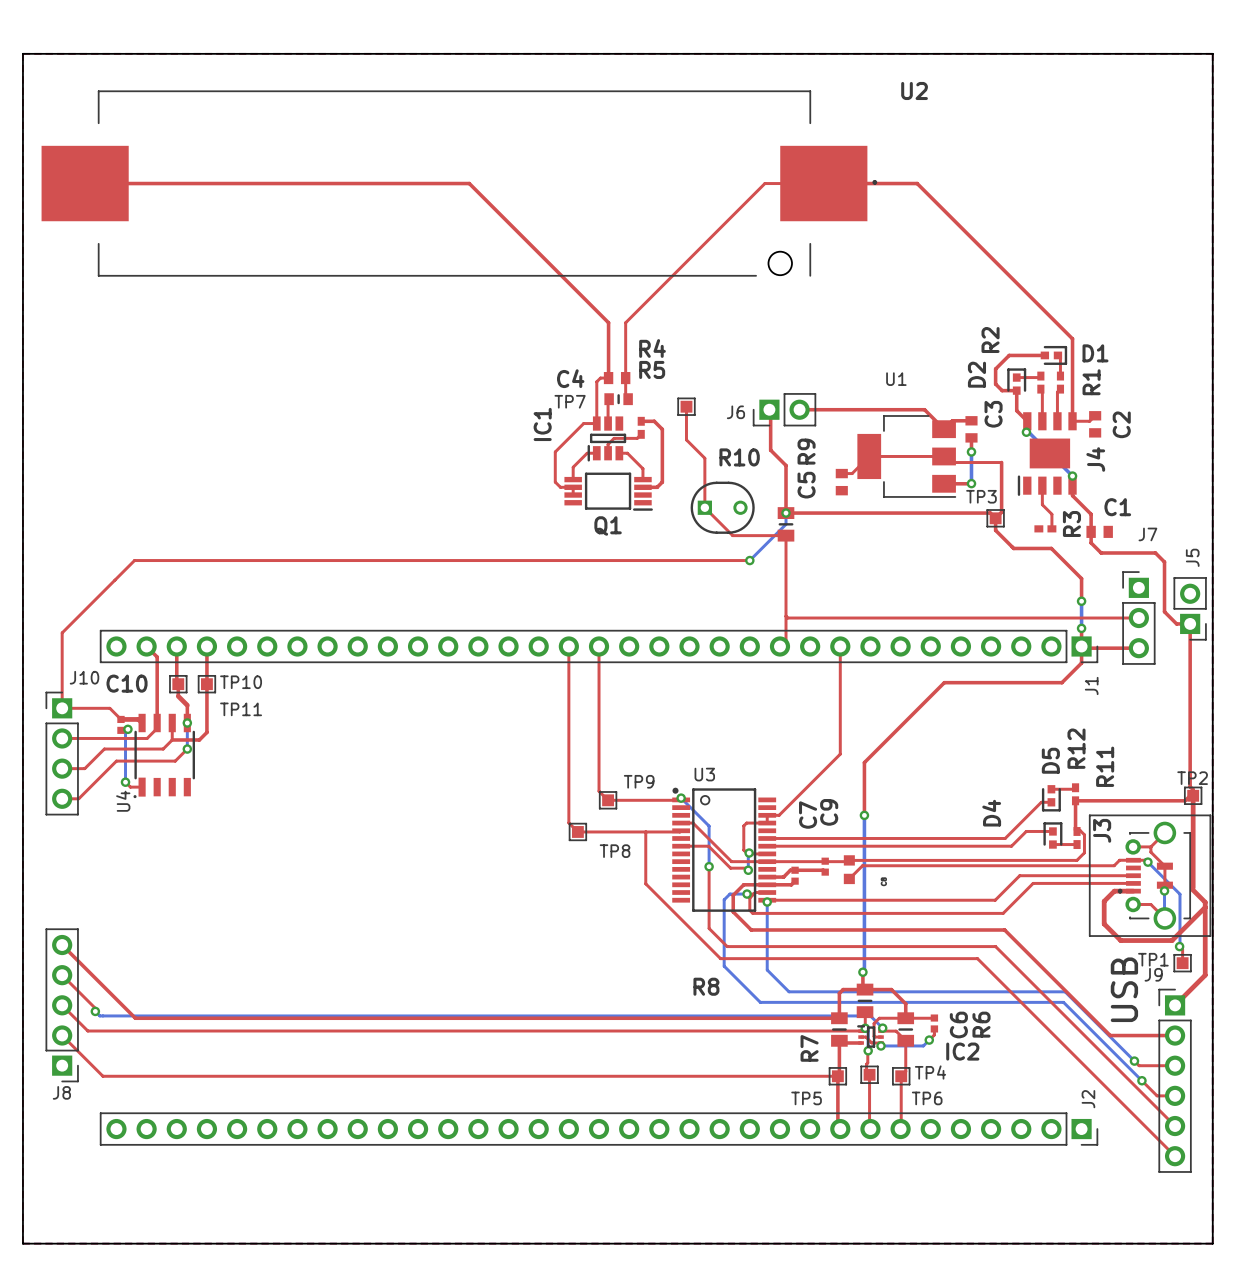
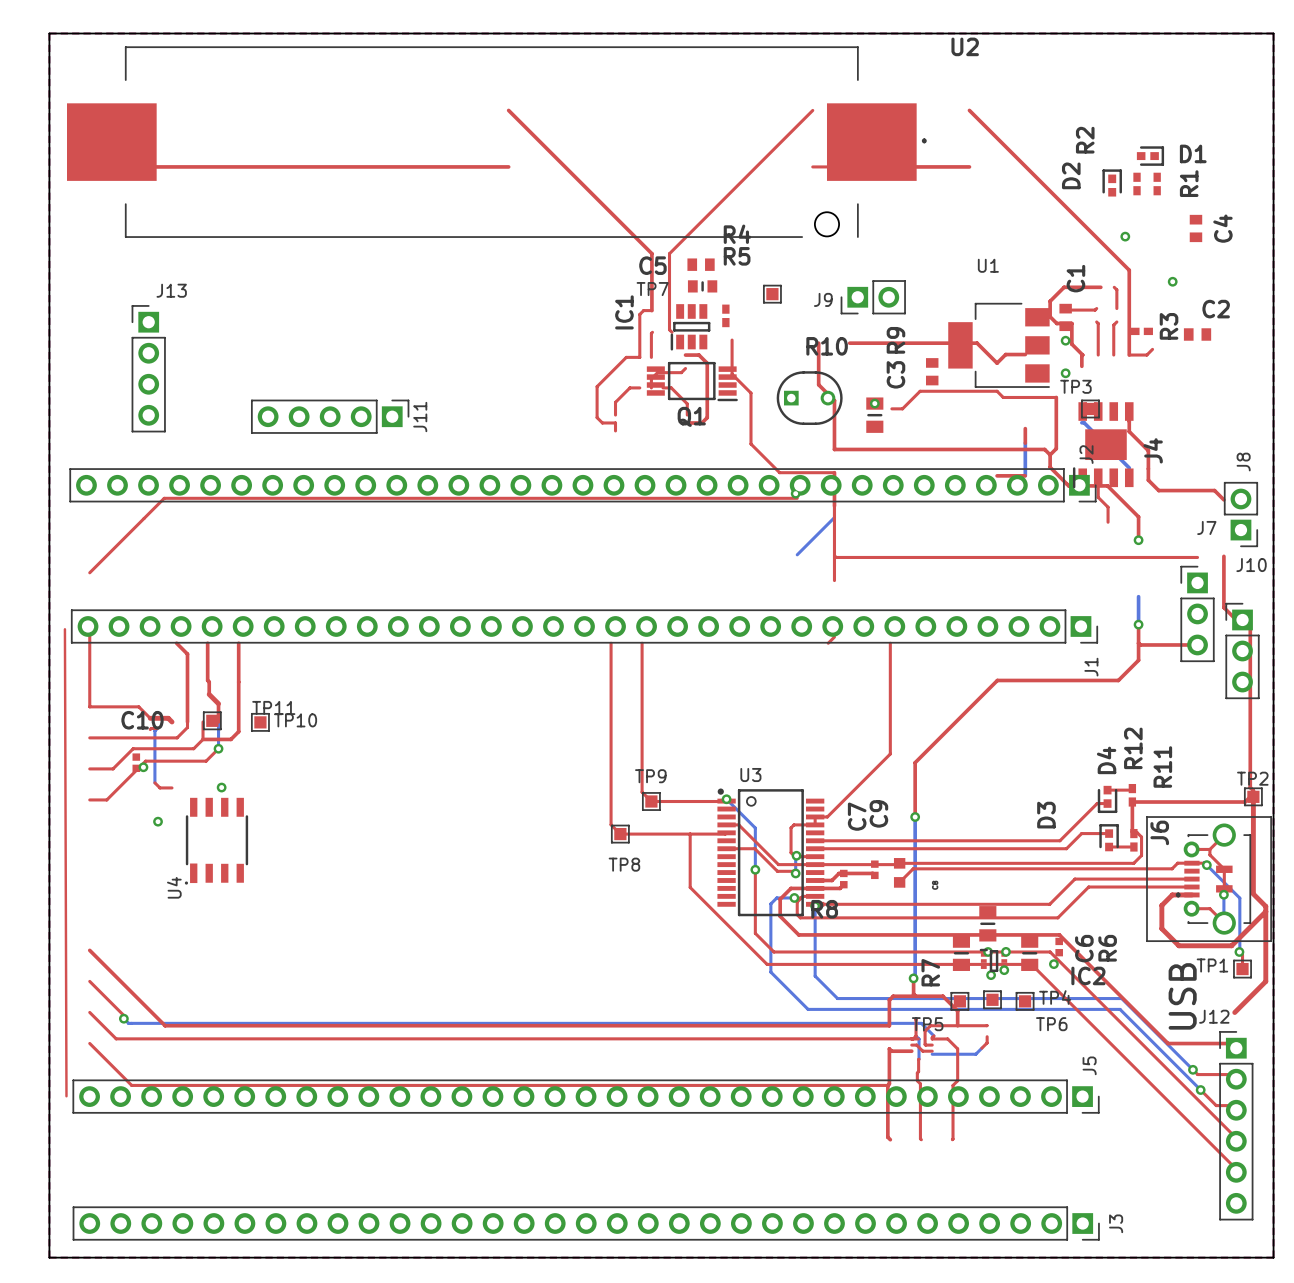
U2 position: (459, 183) -> (496, 142)
top track: (469, 183) (608, 322) -> (508, 110) (651, 253) (651, 310)
top track: (764, 183) (625, 322) -> (812, 110) (669, 253) (669, 310)
top track: (917, 183) (1072, 338) -> (969, 110) (1129, 270) (1129, 326)
via: none -> (1125, 236)
via: none -> (1172, 281)
top track: (608, 323) (608, 378) (600, 378) (596, 381) (596, 423) (583, 423) (555, 451) (555, 482) (560, 487) (573, 487) (573, 495) -> (651, 310) (643, 310) (639, 314) (639, 357) (626, 357) (597, 386) (597, 417) (602, 422) (615, 422) (615, 430)
top track: (625, 341) (625, 396) (628, 399) -> (669, 329) (672, 332)
via: none -> (1065, 340)
top track: none -> (818, 343) (818, 384) (834, 400) (834, 449) (1044, 449) (1050, 454)
top track: (1044, 355) (1009, 355) (995, 369) (995, 384) (1002, 390) (1016, 390) (1016, 410) (1027, 421) (1026, 432) -> (1100, 287) (1064, 287) (1050, 301) (1050, 316) (1056, 323) (1071, 323) (1071, 344) (1082, 355) (1081, 366)
D1 position: (1053, 355) -> (1150, 156)
top track: (1057, 355) (1060, 357) (1060, 376) -> (1114, 287) (1116, 289) (1116, 308)
top track: (1072, 366) (1072, 421) -> (1129, 355) (1146, 355) (1152, 349)
top track: (1040, 376) (1016, 377) -> (1096, 308) (1071, 310)
C4 name position: C4 (570, 378) -> C4 (1222, 228)
C4 rotation: 0° (617, 378) -> 90° clockwise (1195, 228)
C4 position: (617, 378) -> (1195, 228)
J13: none -> (148, 368)
D2 position: (1016, 381) -> (1112, 182)
R2 position: (1040, 382) -> (1137, 184)
R1 position: (1060, 382) -> (1157, 184)
via: none -> (1065, 373)
top track: (1040, 389) (1042, 421) -> (1096, 321) (1098, 355)
top track: (1060, 389) (1057, 392) (1057, 421) -> (1116, 321) (1113, 325) (1113, 355)
top track: (609, 399) (608, 423) -> (652, 332) (651, 357)
R5 position: (618, 399) -> (702, 286)
top track: (686, 406) (686, 439) (704, 458) (704, 507) (732, 535) (786, 535) -> (834, 505) (834, 529)
TP7 position: (686, 406) -> (772, 294)
top track: (770, 409) (770, 450) (786, 465) (786, 480) -> (732, 340) (732, 374) (750, 393) (750, 444) (779, 472) (834, 472)
J6: (784, 409) -> none
top track: (800, 409) (924, 409) (944, 429) (952, 420) (971, 420) -> (849, 343) (977, 343) (997, 363) (1005, 354) (1025, 354)
via: none -> (874, 403)
C3 name position: C3 (993, 414) -> C3 (895, 374)
top track: (1095, 415) (1089, 421) (1072, 421) -> (1223, 499) (1214, 490) (1158, 490) (1148, 480) (1148, 450) (1129, 431) (1129, 411)
top track: (641, 421) (654, 421) (662, 429) (662, 482) (657, 487) (642, 487) -> (685, 355) (698, 355) (707, 363) (707, 417) (701, 422) (687, 422)
C2 rotation: 0° (1095, 424) -> 90° clockwise (1197, 334)
C2 position: (1095, 424) -> (1197, 334)
C2 name position: C2 (1121, 424) -> C2 (1216, 309)
J11: none -> (330, 416)
R4 position: (641, 427) -> (725, 315)
C3 position: (971, 429) -> (932, 371)
via: (1026, 432) -> none
top track: (641, 434) (637, 438) (614, 438) (608, 444) (608, 453) -> (685, 368) (681, 372) (657, 372) (651, 378) (651, 387)
IC1 position: (606, 438) -> (690, 327)
via: (971, 451) -> none
top track: (596, 453) (587, 453) (573, 467) (573, 479) -> (639, 387) (629, 387) (615, 402) (615, 415)
top track: (619, 453) (627, 453) (642, 468) (642, 479) -> (663, 387) (671, 387) (687, 403) (687, 415)
U1 position: (906, 456) -> (999, 345)
top track: (841, 473) (852, 473) (869, 456) (944, 456) (950, 462) (1001, 462) (1001, 512) (995, 518) -> (891, 408) (902, 408) (920, 391) (997, 391) (1003, 397) (1056, 397) (1056, 448) (1050, 454)
top track: (1072, 476) (1072, 495) (1091, 514) (1091, 542) (1101, 552) (1155, 552) (1164, 562) -> none
via: (1072, 476) -> none
C5 rotation: 0° (841, 482) -> 90° clockwise (701, 264)
C5 position: (841, 482) -> (701, 264)
via: (971, 483) -> none
Q1 position: (608, 491) -> (692, 381)
via: none -> (795, 493)
R10 position: (722, 507) -> (809, 398)
top track: (786, 513) (990, 513) (995, 518) -> none
via: (786, 513) -> none
top track: (995, 518) (995, 530) (1013, 548) (1051, 548) (1081, 578) (1081, 601) -> (1050, 454) (1050, 467) (1068, 485) (1107, 485) (1138, 516) (1138, 540)
TP3 position: (995, 518) -> (1090, 408)
R9 position: (786, 524) -> (874, 415)
R3 position: (1045, 528) -> (1141, 331)
C1 rotation: 0° (1099, 531) -> 90° clockwise (1065, 317)
C1 position: (1099, 531) -> (1065, 317)
via: none -> (1138, 540)
J5 name position: J5 (1192, 557) -> J5 (1089, 1065)
top track: (749, 560) (134, 560) (62, 632) -> (797, 498) (164, 498) (89, 572)
via: (749, 560) -> none
J5 footprint: [1173, 577, 1207, 641] -> [72, 1079, 1100, 1114]
top track: (786, 585) (786, 640) -> none
via: (1081, 601) -> none
top track: (786, 616) (787, 618) (1138, 618) -> (834, 555) (836, 557) (1197, 557)
top track: none -> (64, 629) (66, 1096)
J1 position: (599, 646) -> (584, 626)
TP11 position: (178, 684) -> (212, 720)
TP10 position: (206, 684) -> (260, 722)
J10 footprint: [45, 691, 79, 816] -> [1225, 602, 1260, 700]
via: (187, 723) -> none
C10 position: (120, 724) -> (136, 762)
via: (127, 729) -> none
U4 position: (164, 755) -> (216, 841)
D5 name: D5 (1050, 760) -> D4 (1106, 760)
via: none -> (143, 767)
TP9 name position: TP9 (639, 781) -> TP9 (650, 776)
via: (125, 782) -> none
via: none -> (221, 787)
D4 name: D4 (991, 813) -> D3 (1046, 815)
via: none -> (158, 821)
J3 name: J3 (1102, 830) -> J6 (1159, 832)
TP8 name position: TP8 (615, 851) -> TP8 (624, 864)
J8 footprint: [45, 928, 79, 1083] -> [1223, 482, 1258, 548]
via: none -> (988, 951)
via: none -> (1005, 951)
via: none -> (1053, 964)
via: none -> (1004, 970)
via: none -> (991, 975)
J9 name position: J9 (1153, 974) -> J9 (823, 299)
J9 footprint: [1158, 988, 1192, 1173] -> [840, 280, 906, 315]
R8 position: (865, 1000) -> (987, 923)
C6 position: (934, 1023) -> (1059, 947)
via: (865, 1028) -> none
via: (882, 1028) -> none
R7 position: (839, 1029) -> (961, 953)
R6 position: (905, 1029) -> (1029, 953)
IC2 position: (870, 1036) -> (993, 960)
via: (929, 1040) -> none
via: (881, 1045) -> none
via: (868, 1050) -> none
TP6 position: (869, 1074) -> (992, 999)
TP5 position: (837, 1076) -> (959, 1001)
TP4 position: (901, 1076) -> (1025, 1001)
J8 name position: J8 (61, 1092) -> J8 (1243, 462)
J12: none -> (1236, 1125)
J2 position: (599, 1129) -> (582, 485)
J3: none -> (586, 1223)

